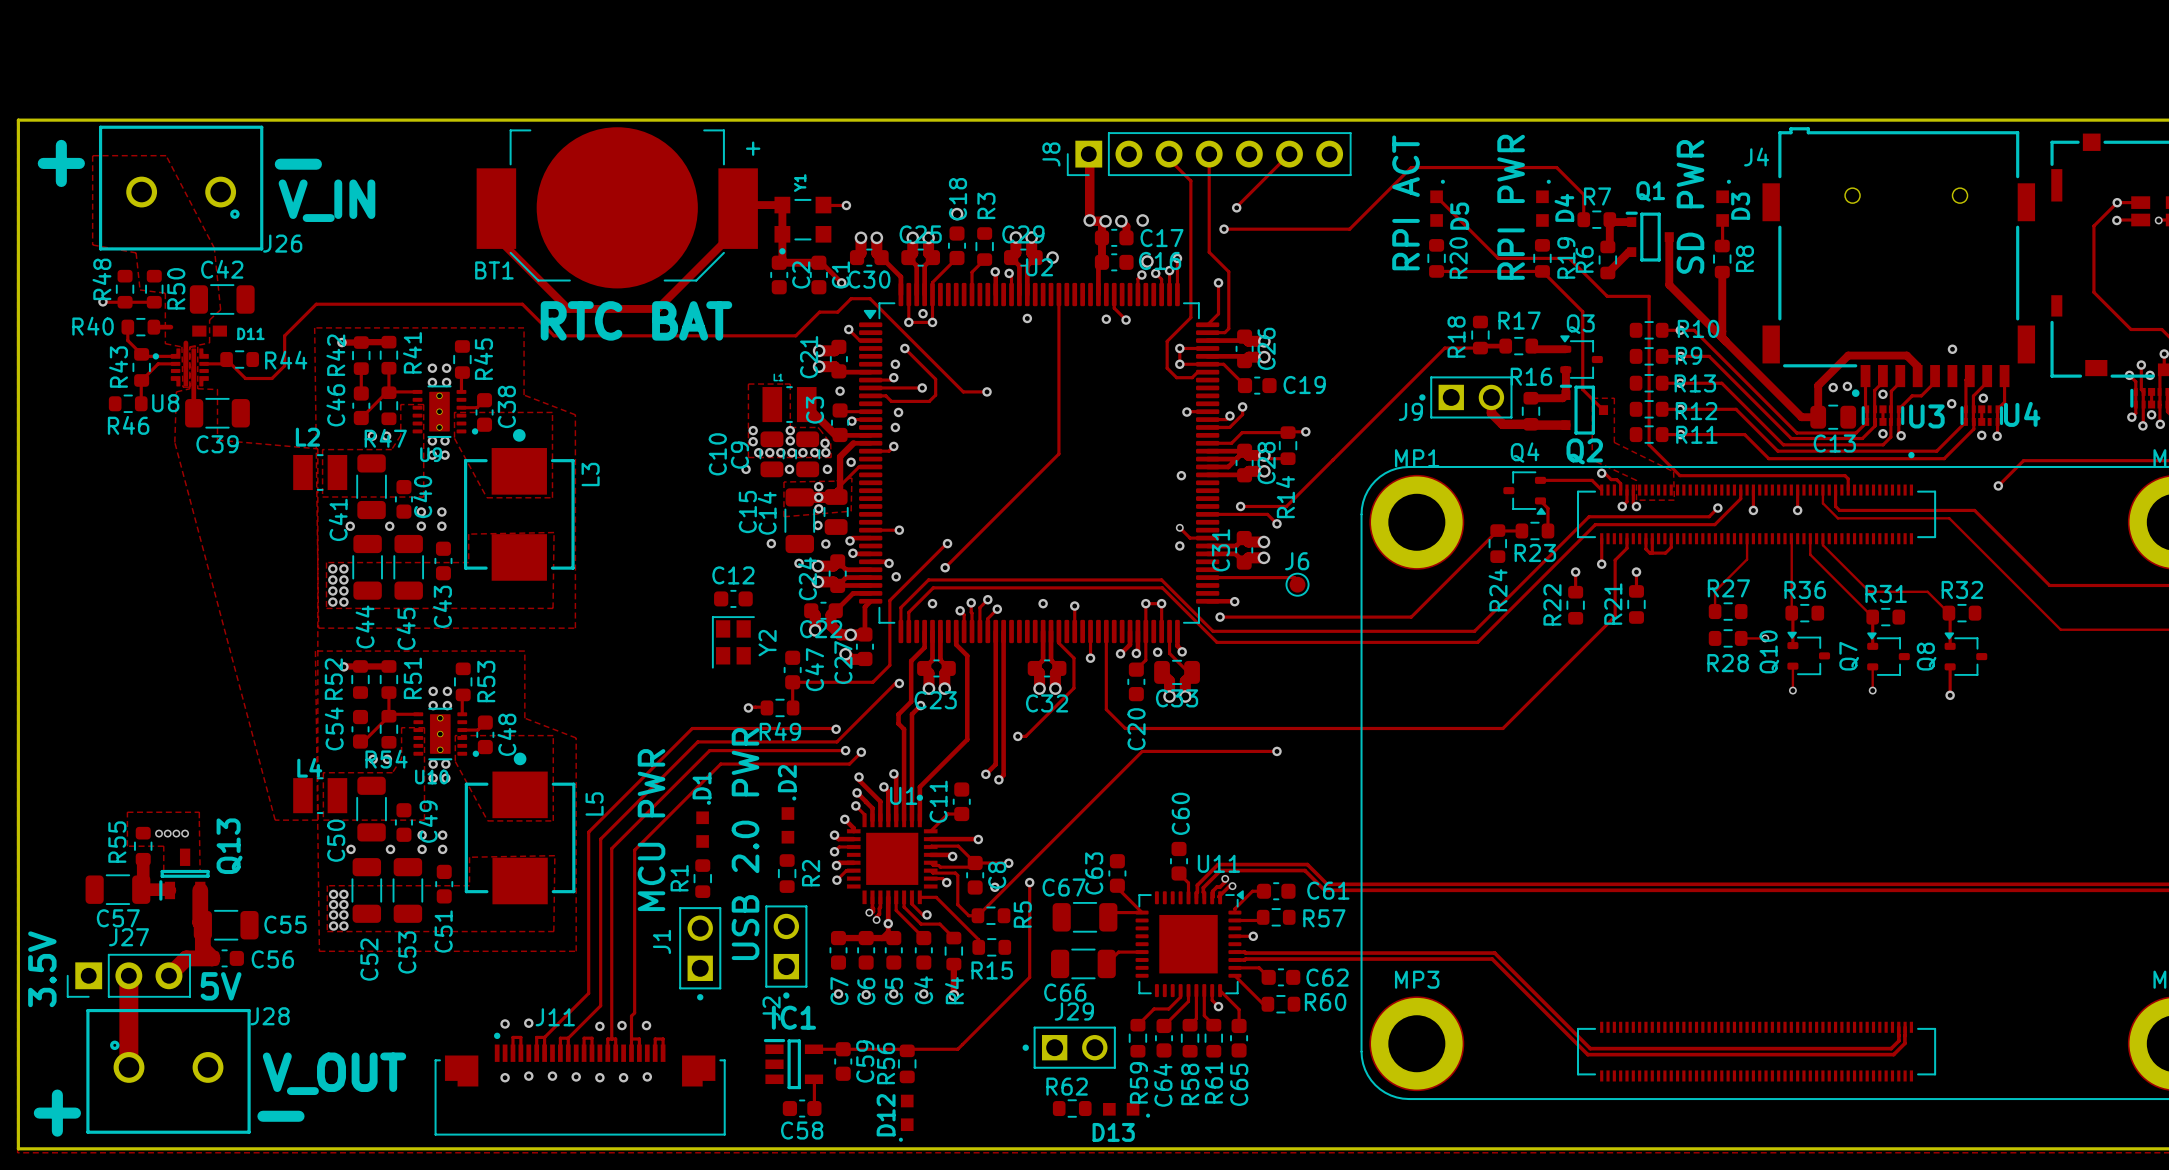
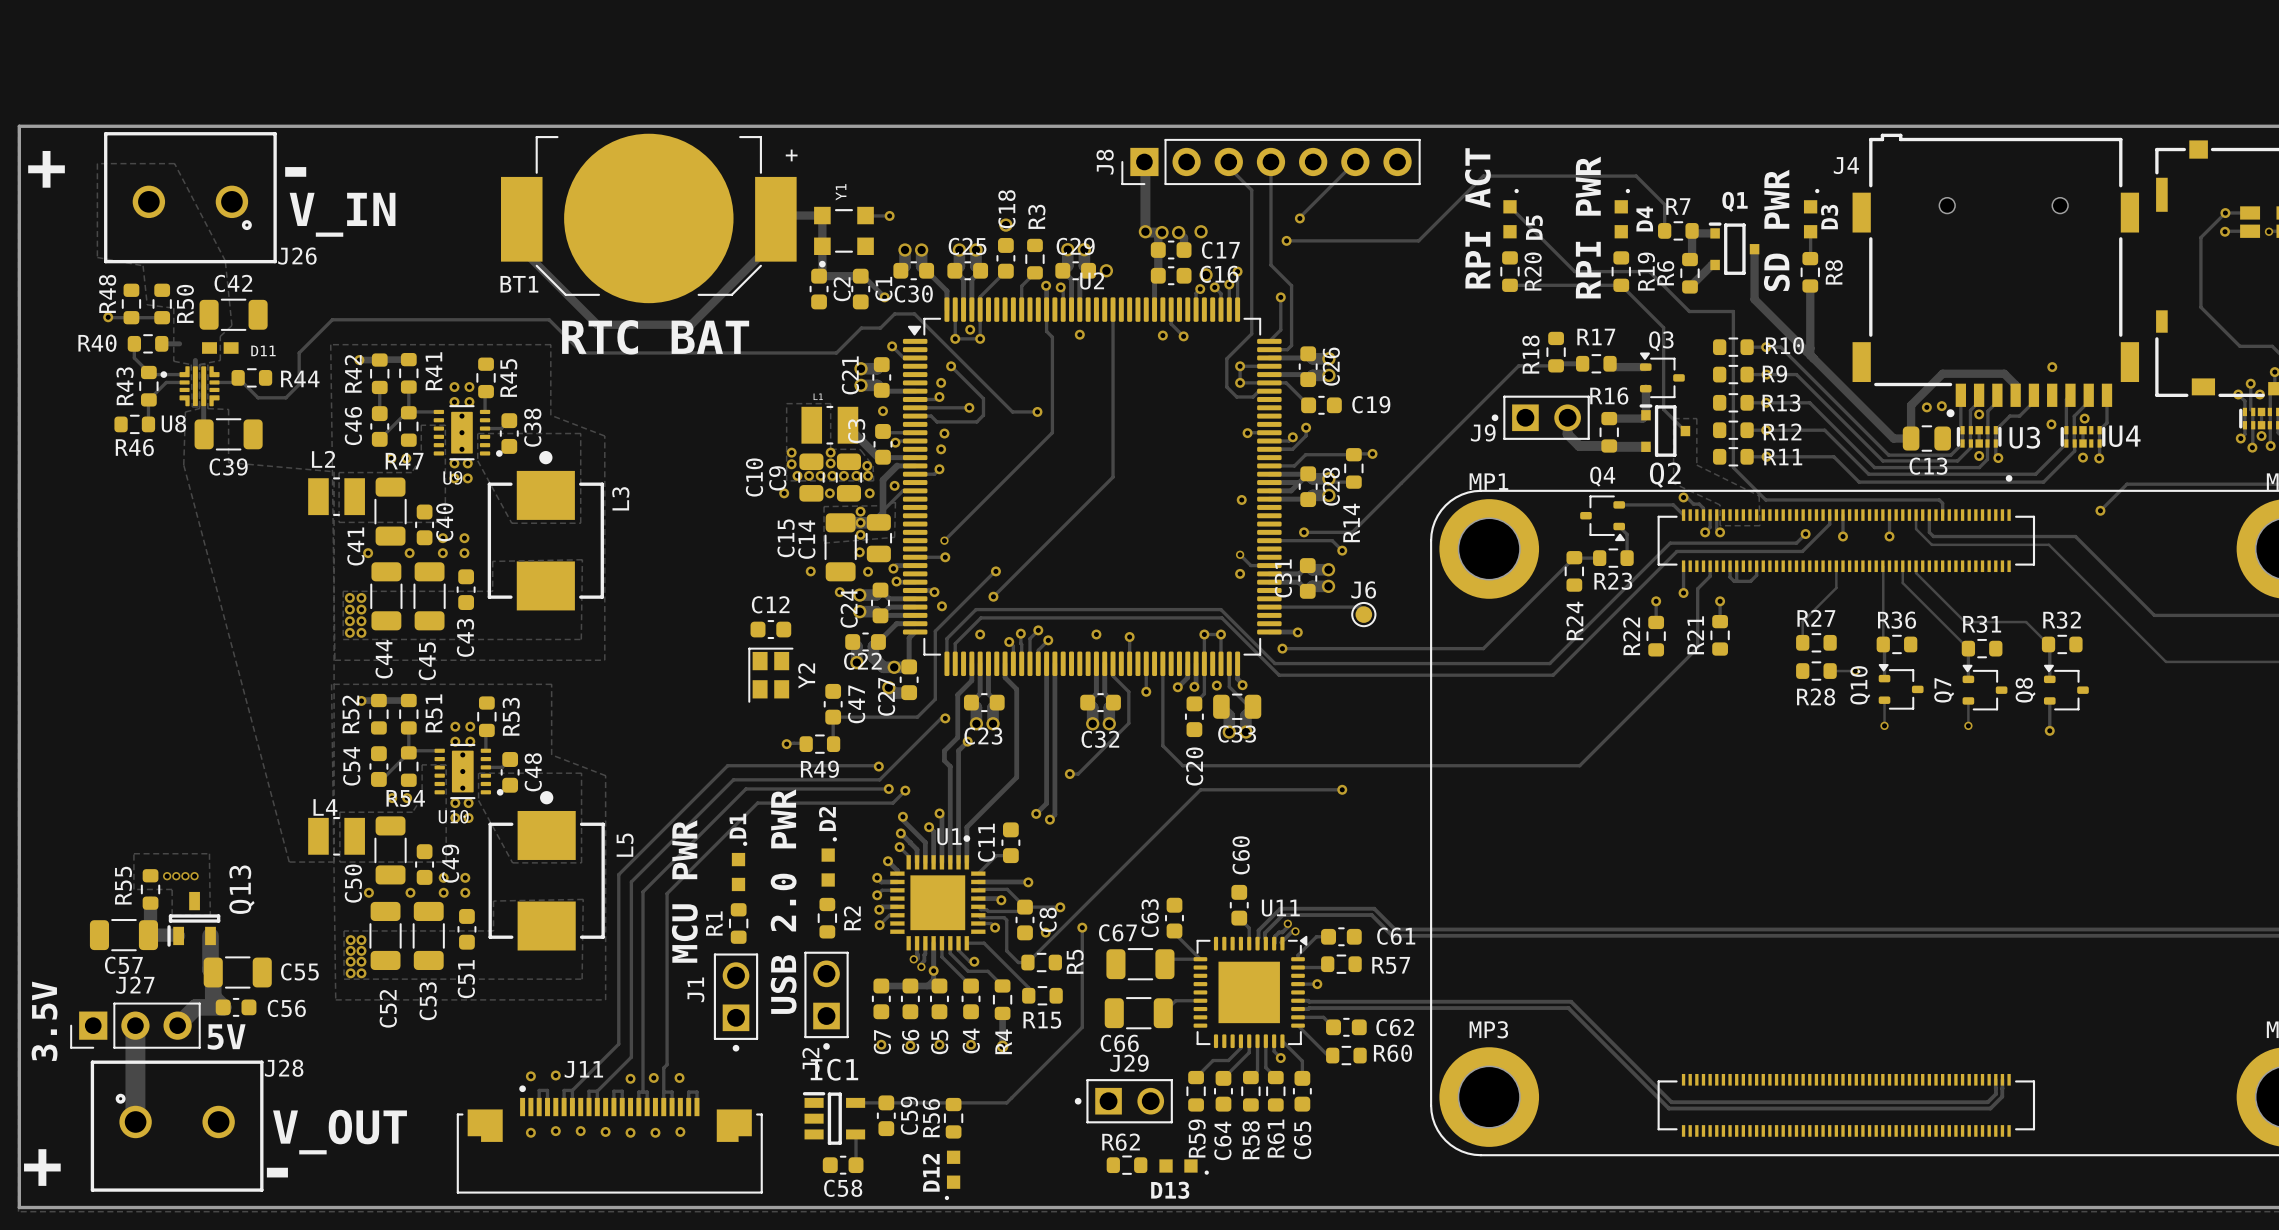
track: none -> (1046, 309) (1046, 331) (1052, 337) (1052, 432) (944, 540)
via: none -> (944, 540)

